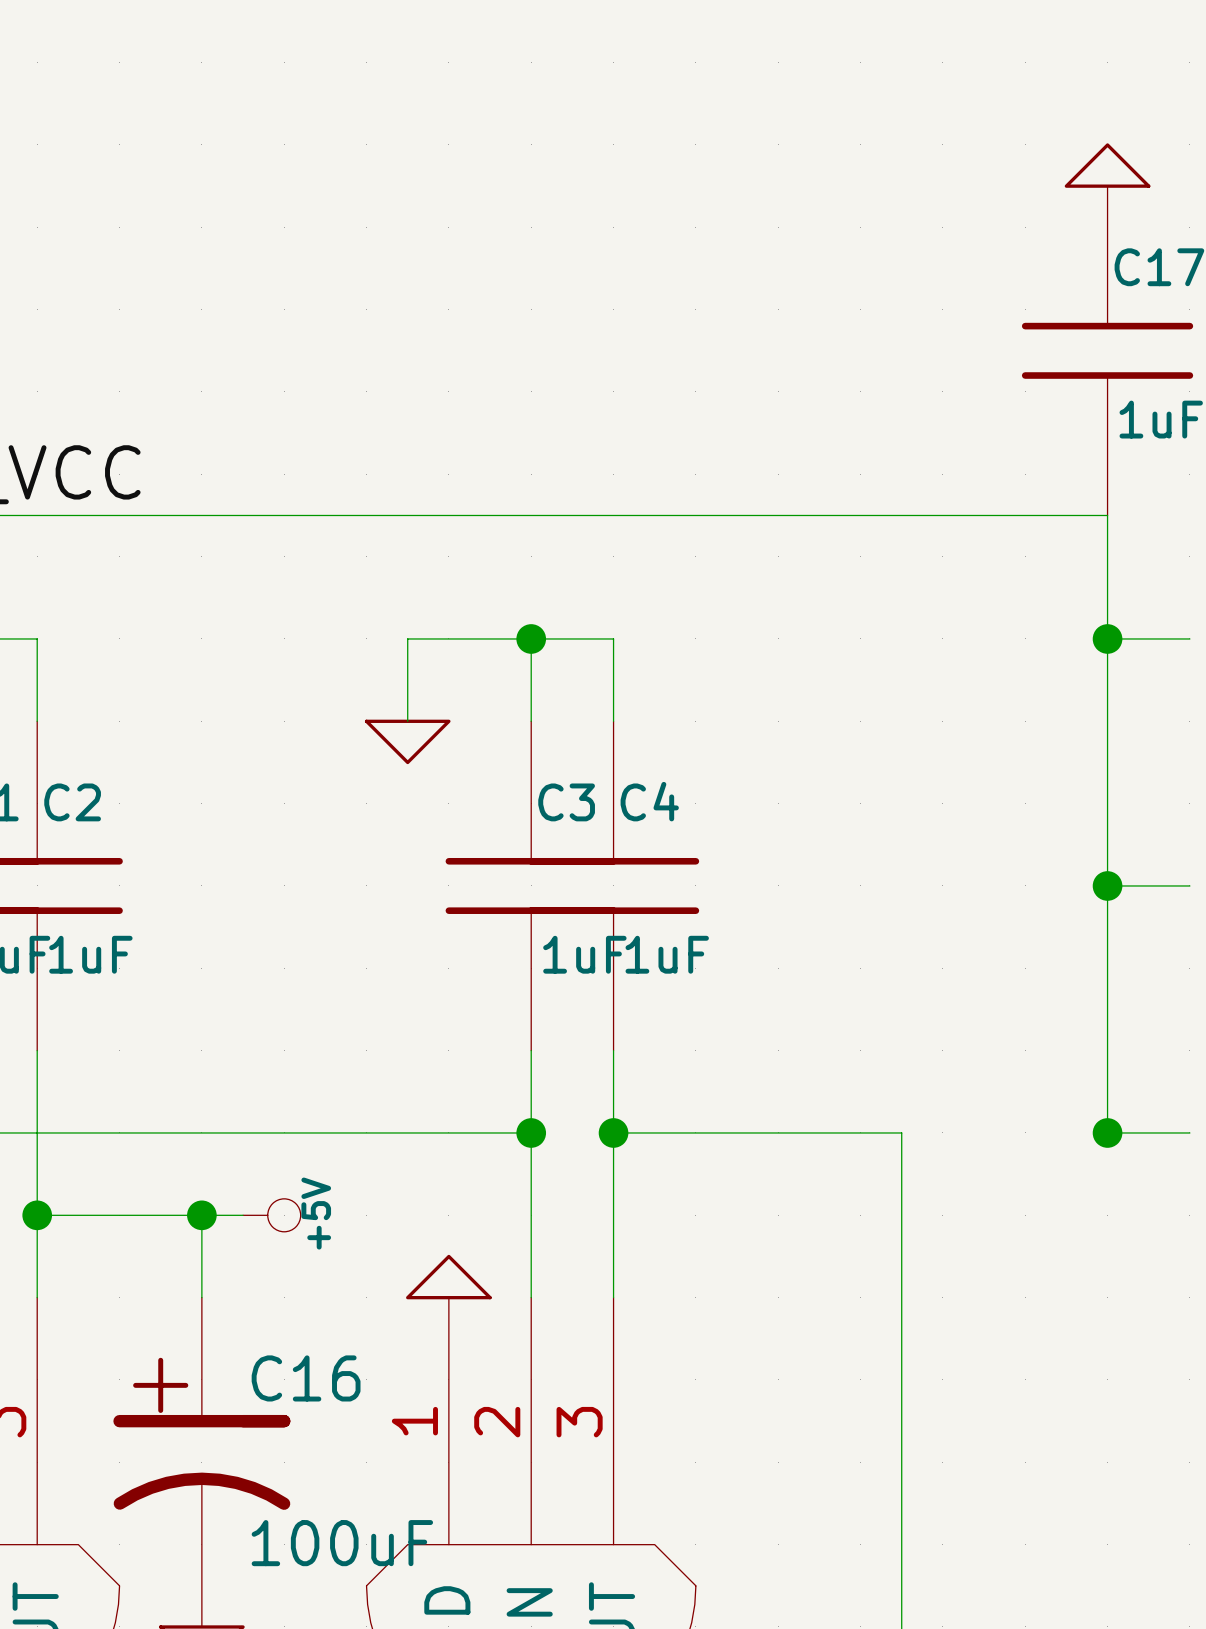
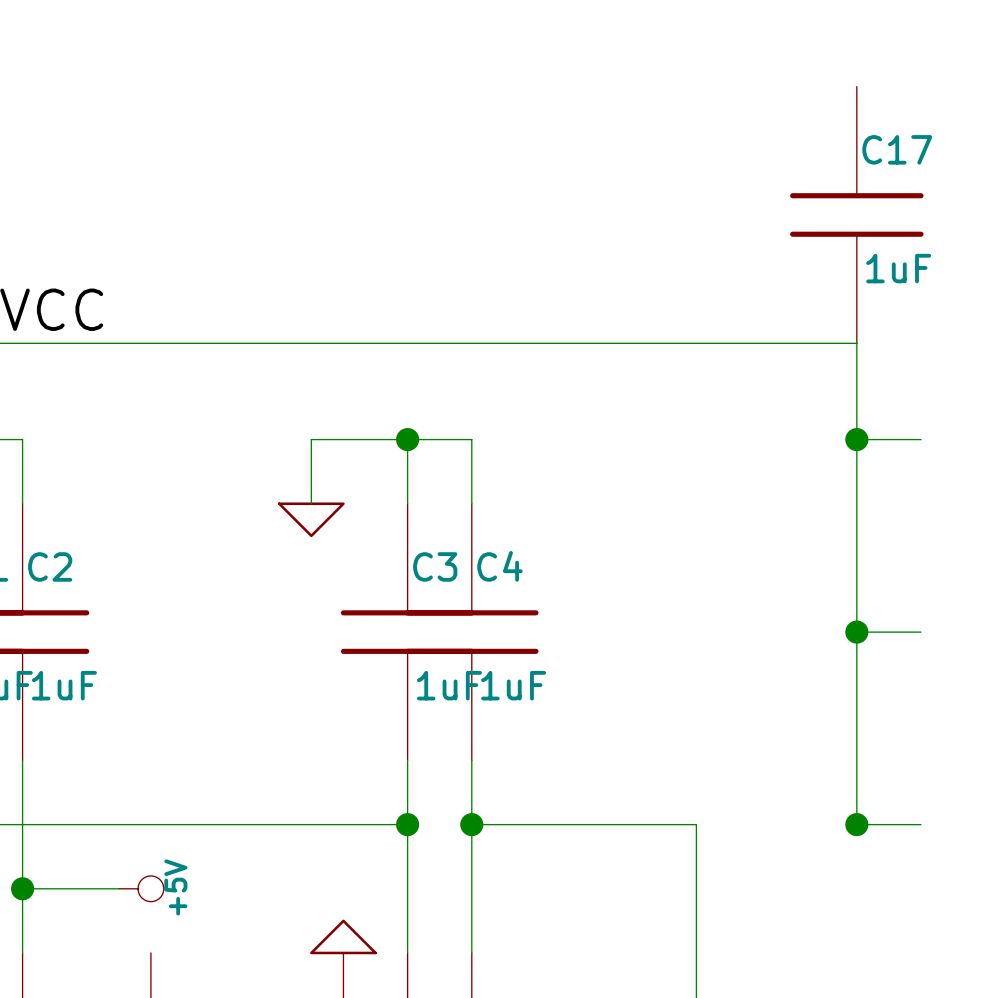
power symbol: (1107, 165) -> none
wire: (201, 1215) (201, 1297) -> none
junction: (201, 1215) -> none
power symbol position: +5V (271, 1215) -> +5V (141, 888)

